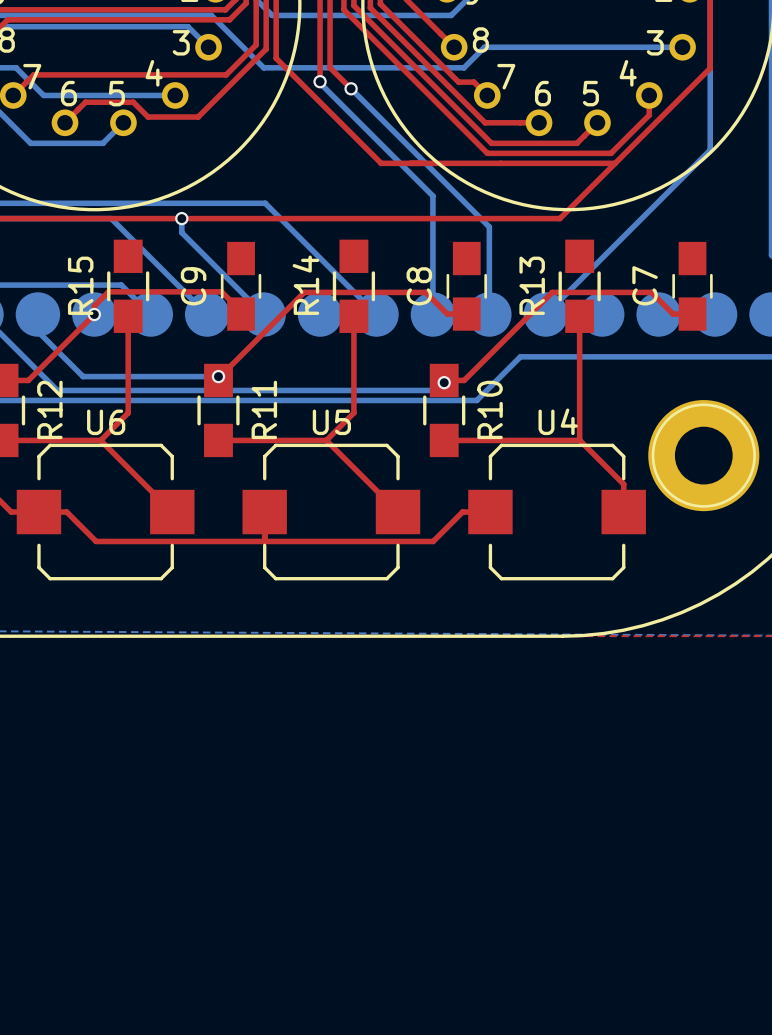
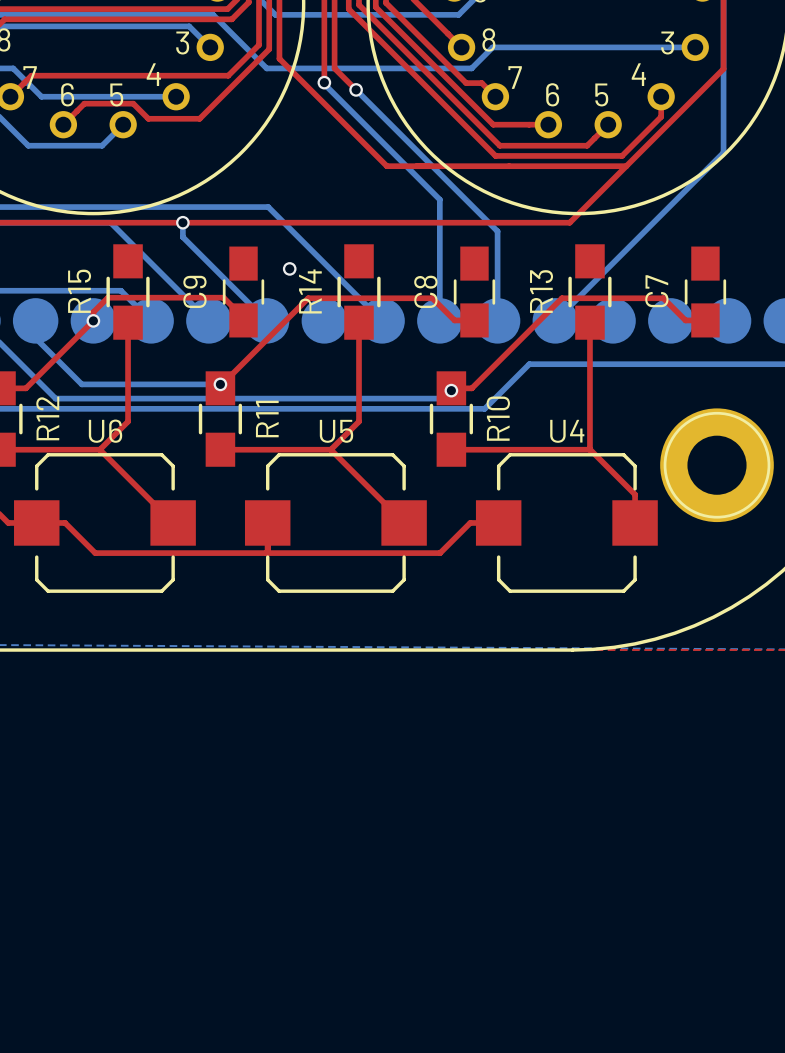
via: none -> (289, 268)

